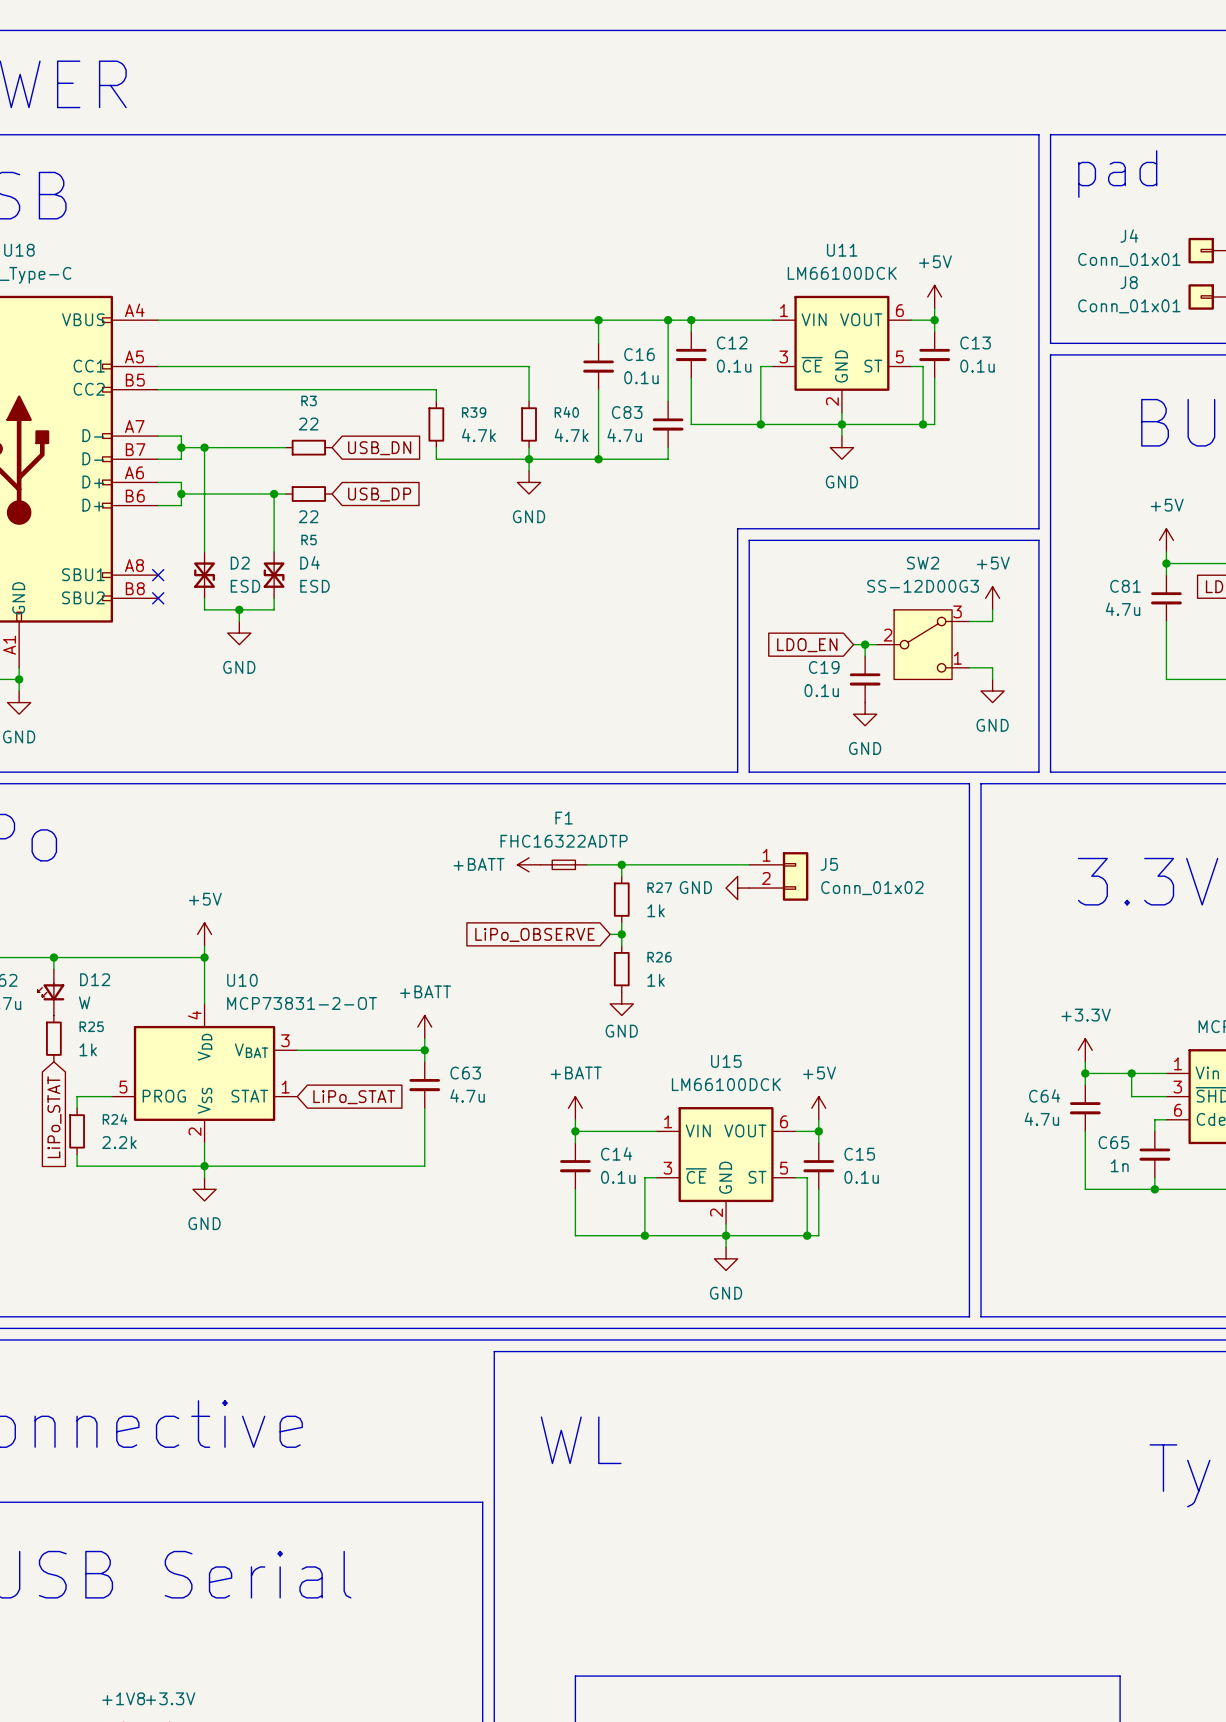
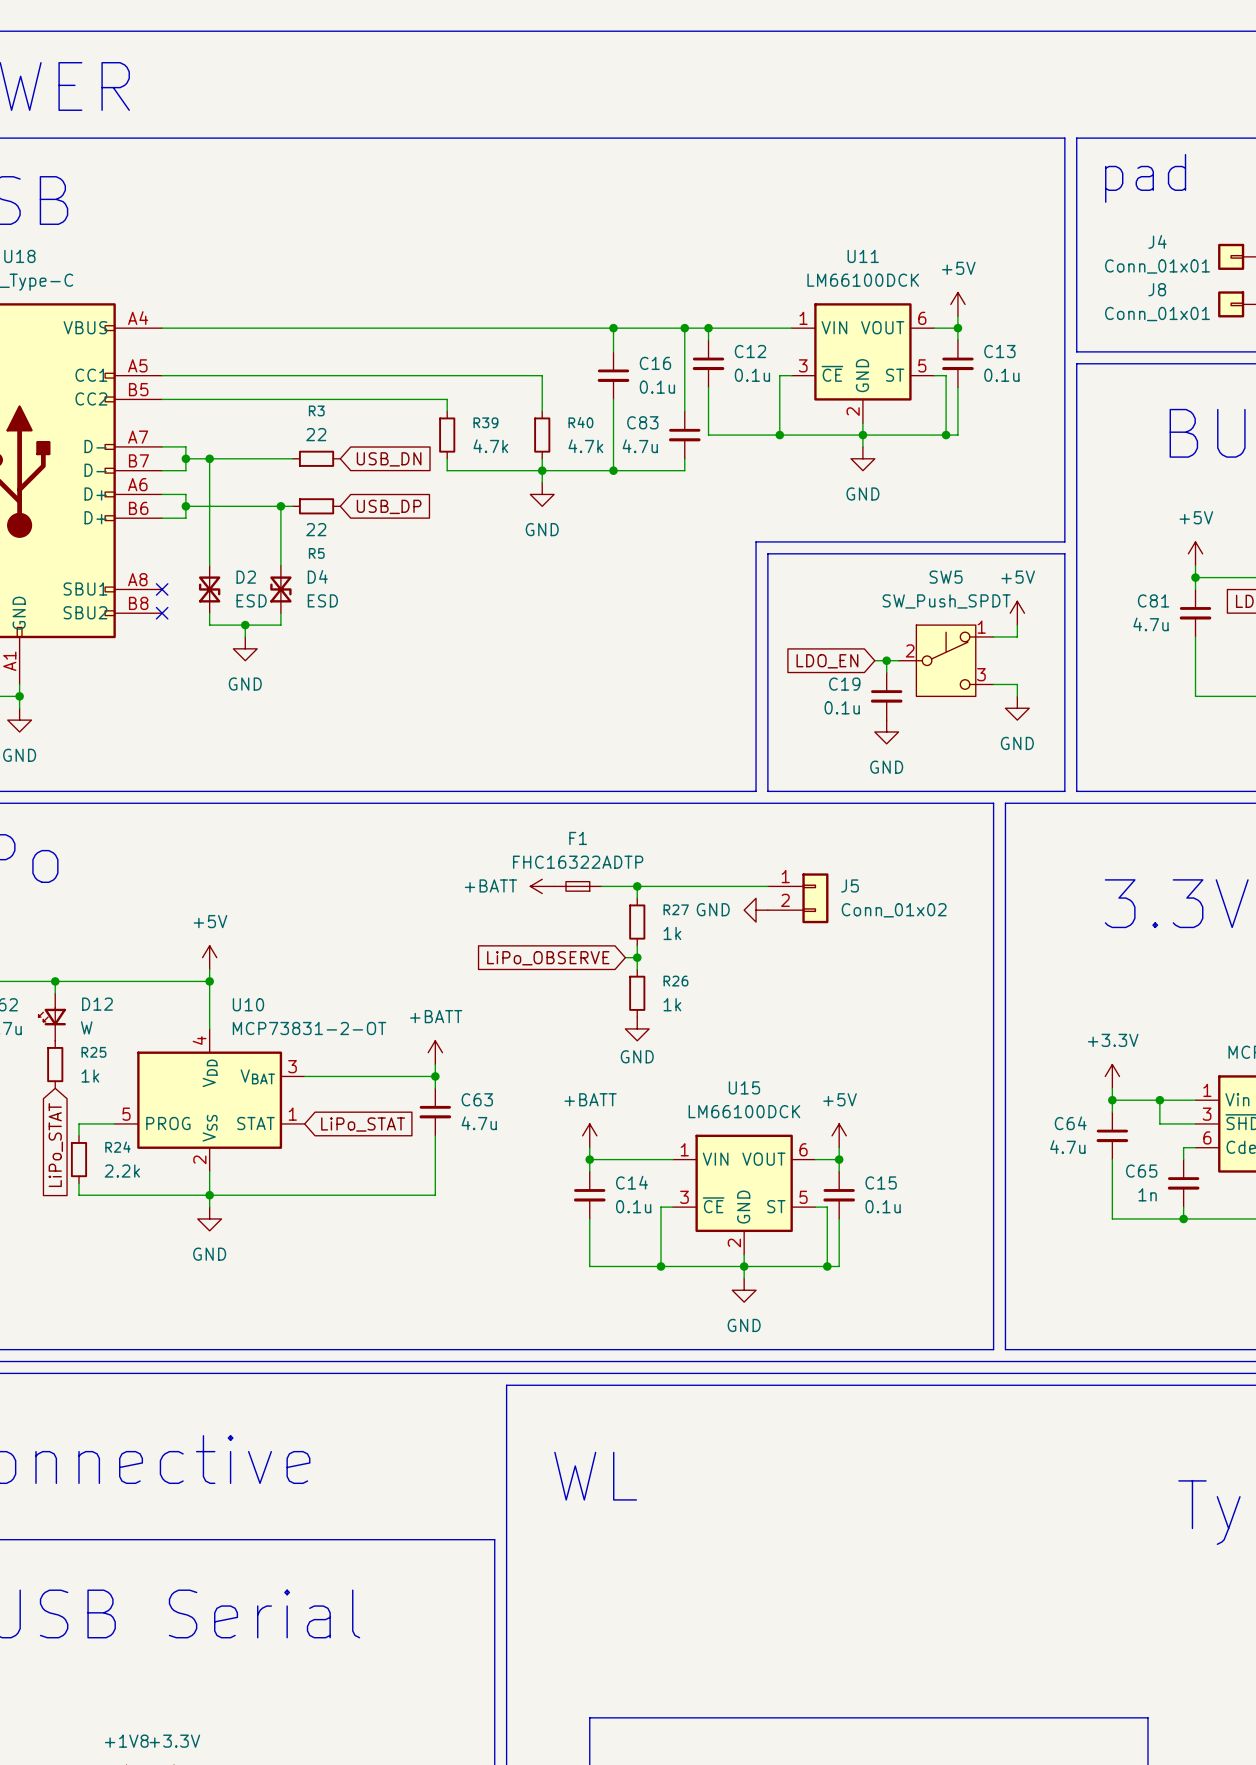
SW2: SS-12D00G3 (923, 644) -> none
SW5: none -> SW_Push_SPDT (946, 660)

